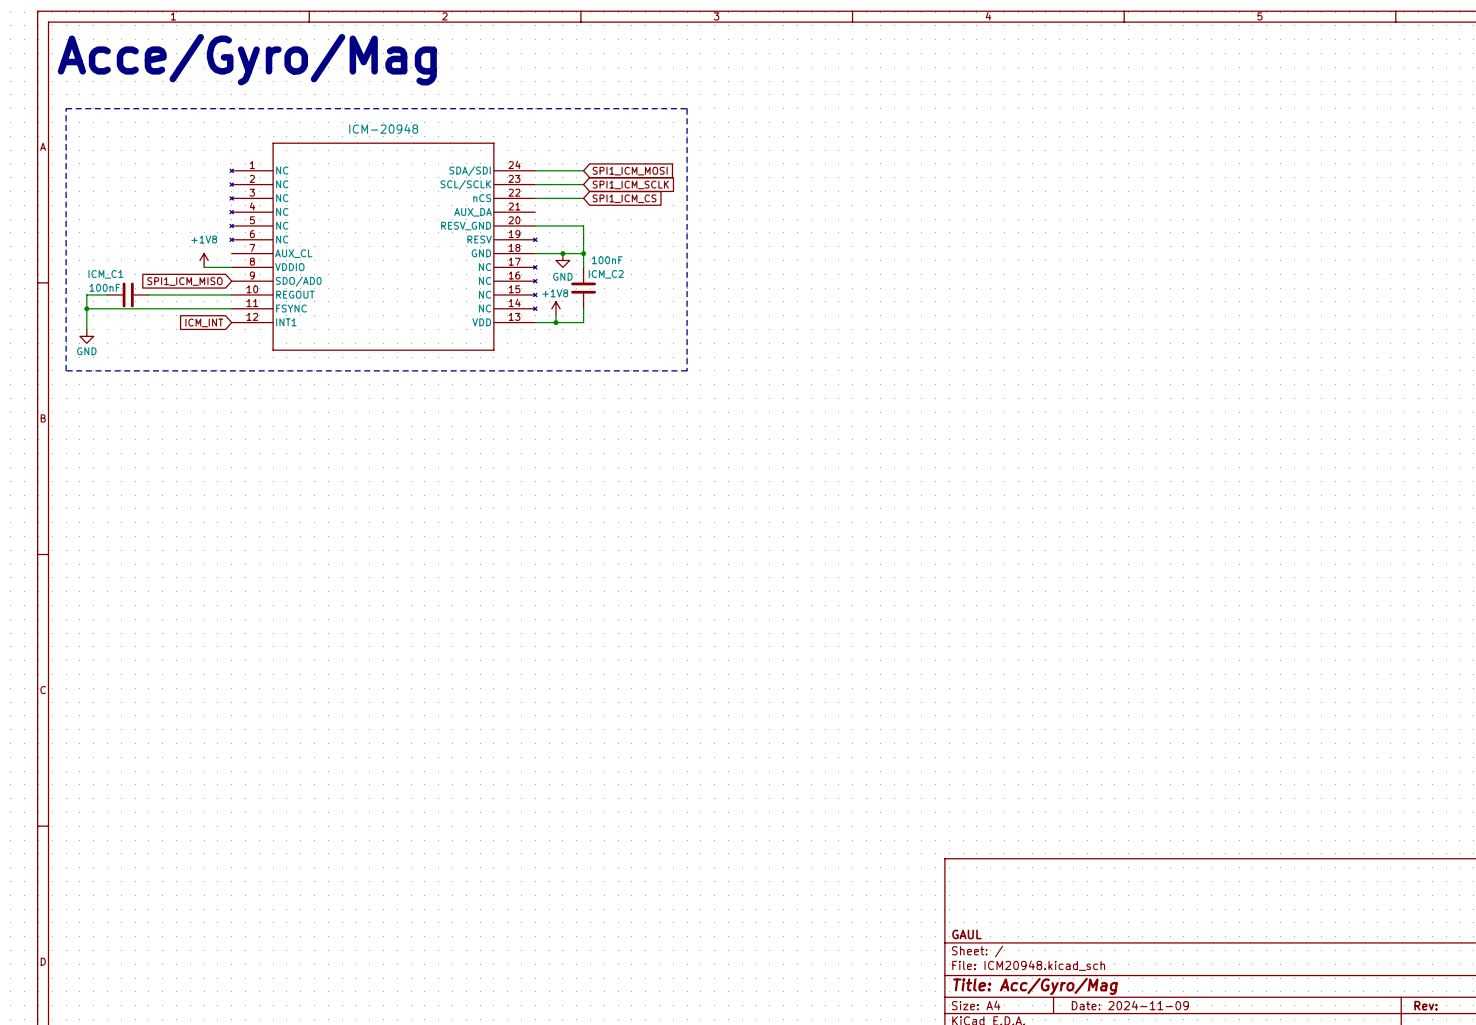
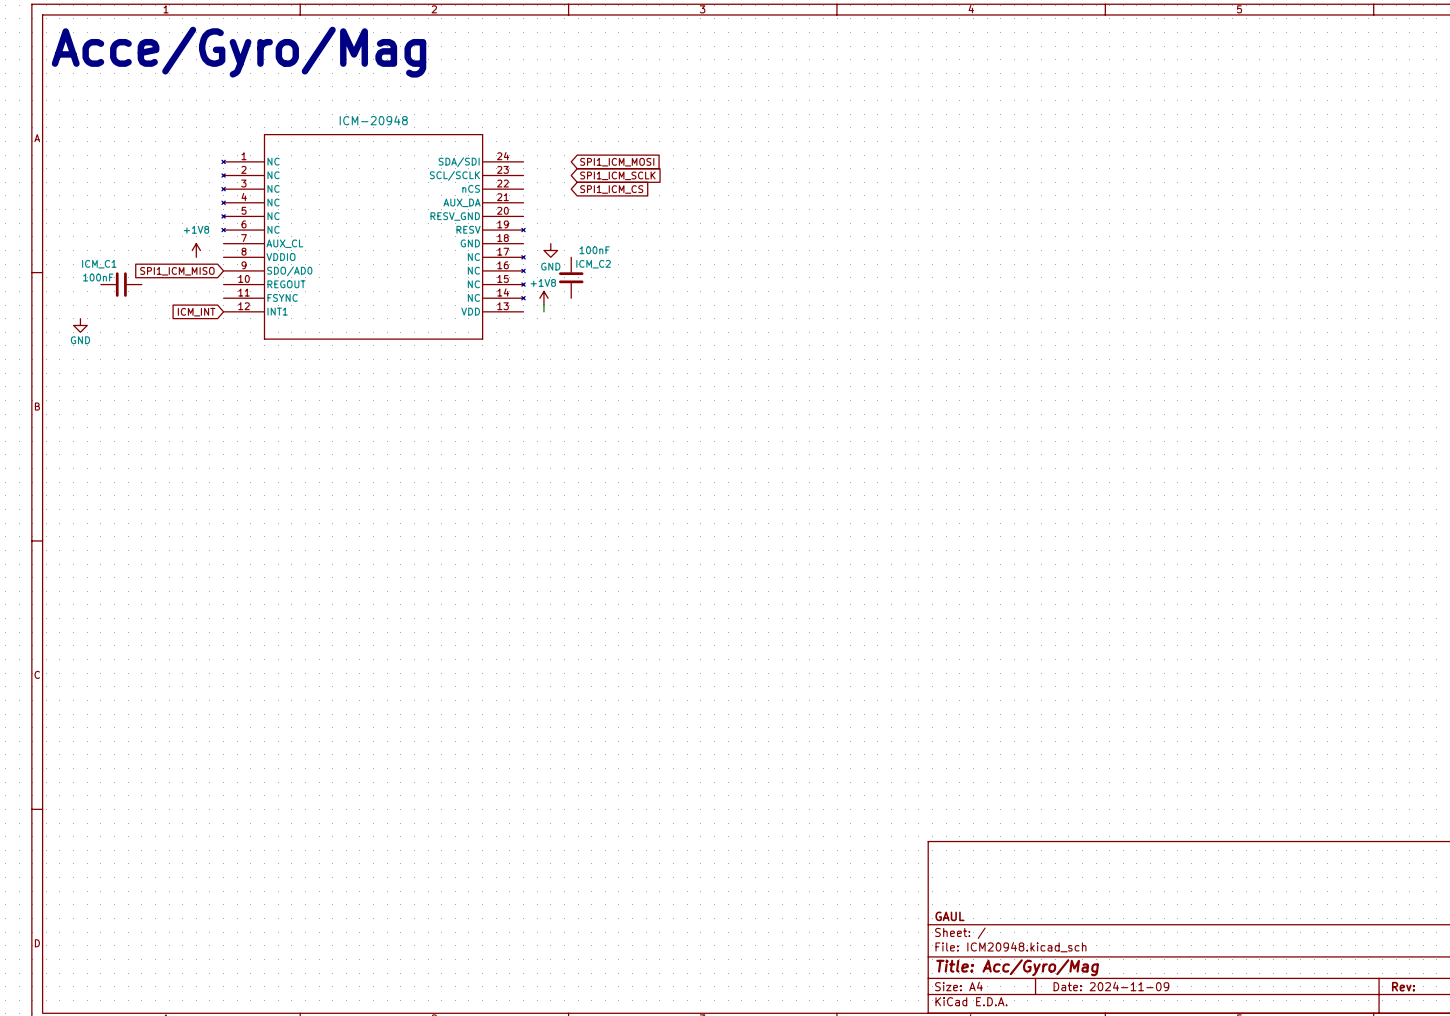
line: (66, 108) (687, 108) (687, 370) (66, 370) (66, 108) -> none
wire: (535, 170) (583, 170) -> none
wire: (535, 184) (583, 184) -> none
wire: (535, 198) (583, 198) -> none
wire: (535, 225) (583, 225) (583, 267) -> none
wire: (535, 253) (583, 253) -> none
junction: (562, 253) -> none
junction: (583, 253) -> none
wire: (204, 267) (231, 267) -> none
wire: (107, 294) (86, 294) (86, 329) -> none
wire: (148, 294) (231, 294) -> none
wire: (86, 308) (231, 308) -> none
junction: (86, 308) -> none
wire: (583, 308) (583, 322) (535, 322) -> none
junction: (555, 322) -> none

